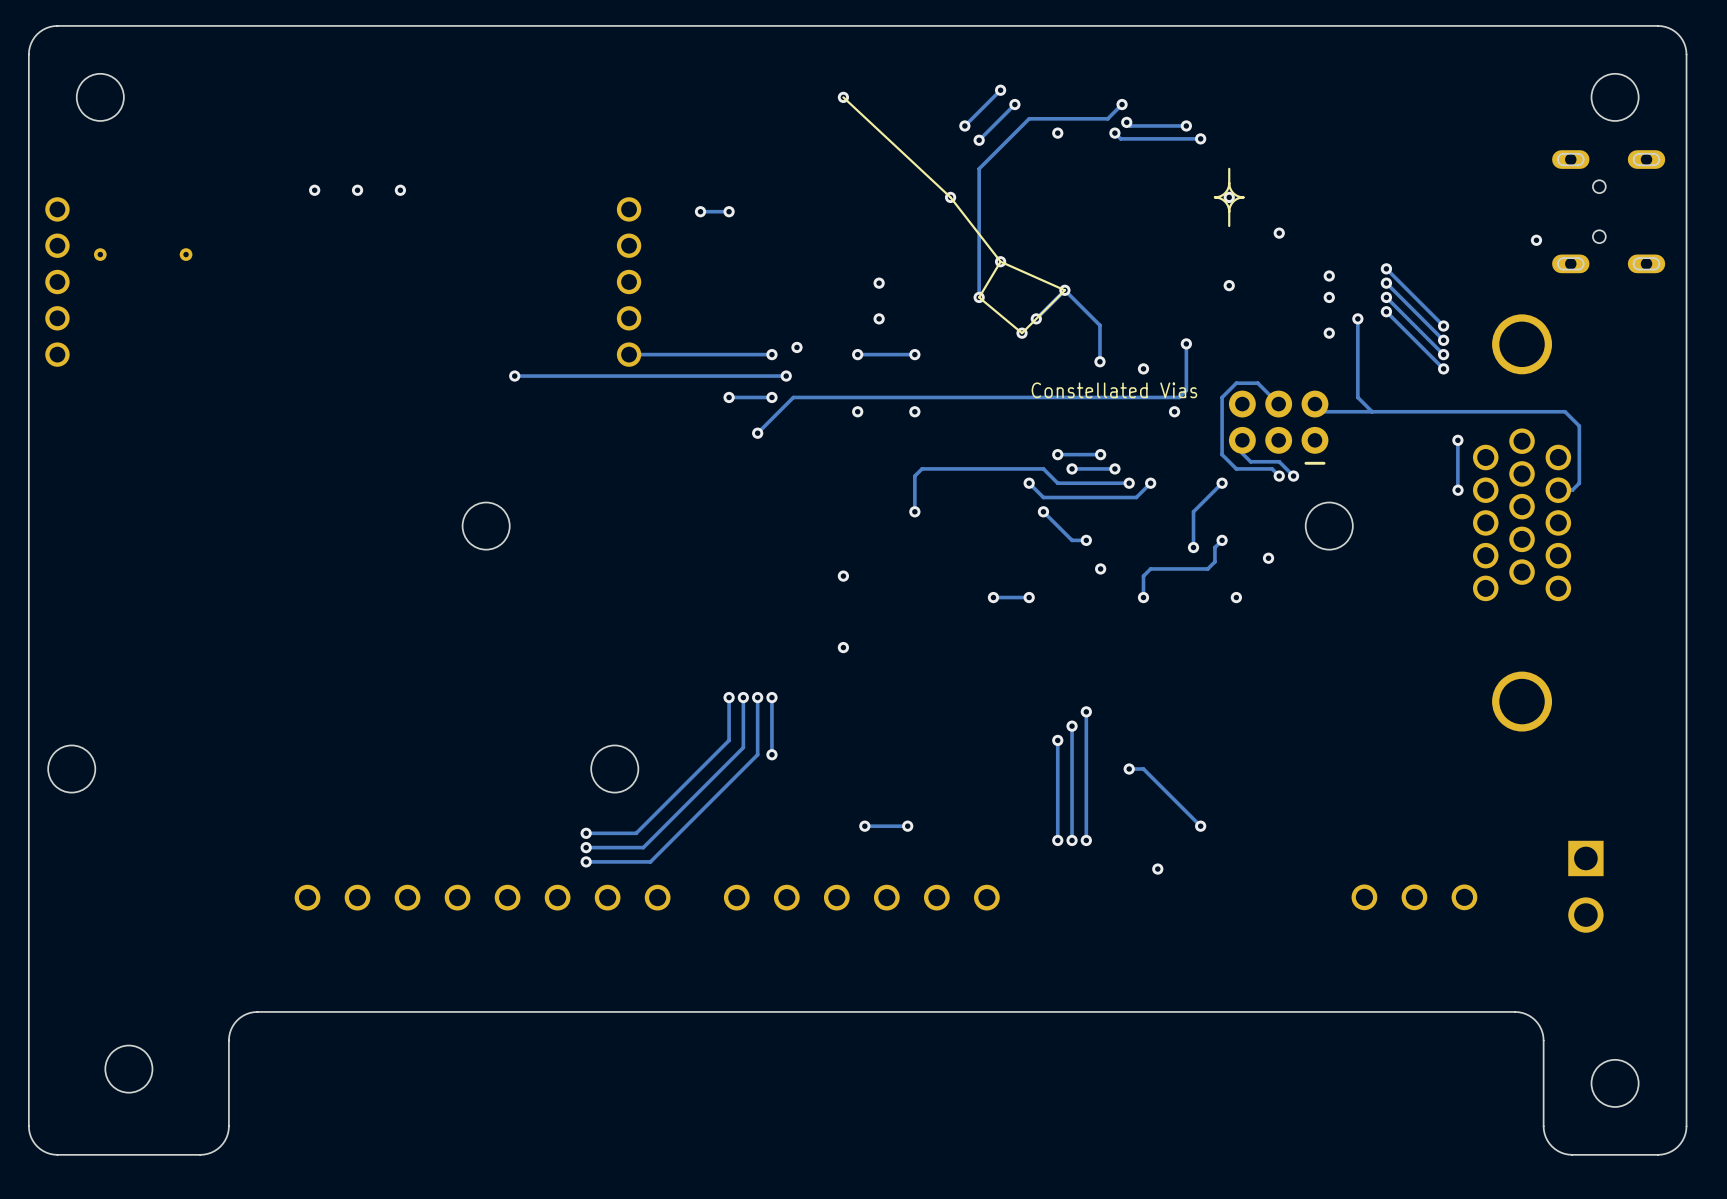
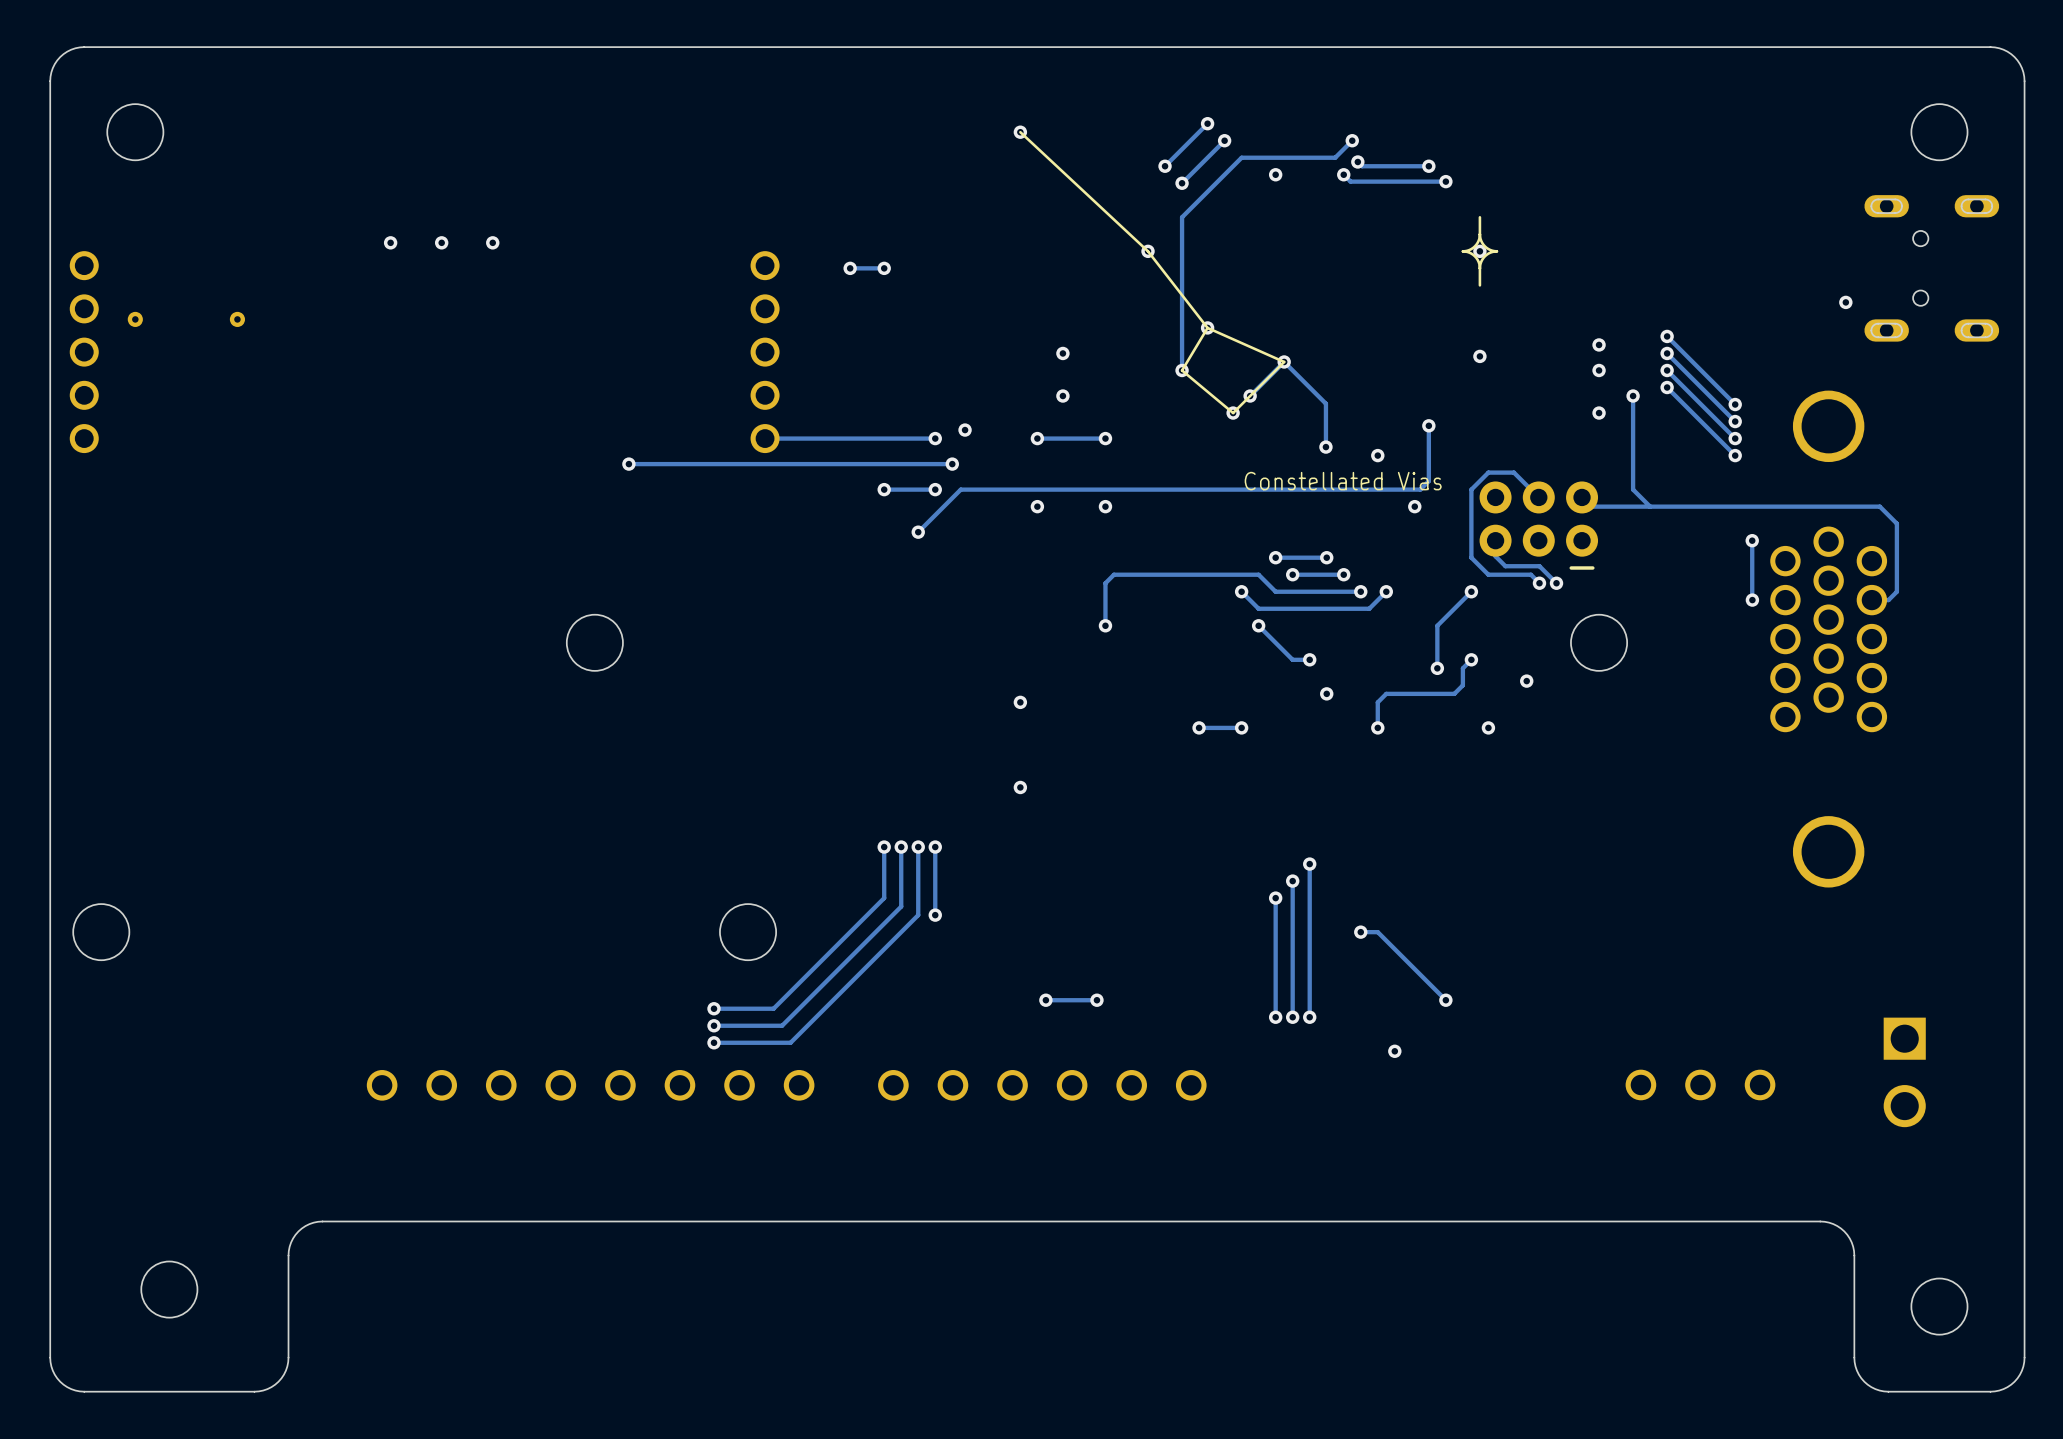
via: (1279, 233) -> none

